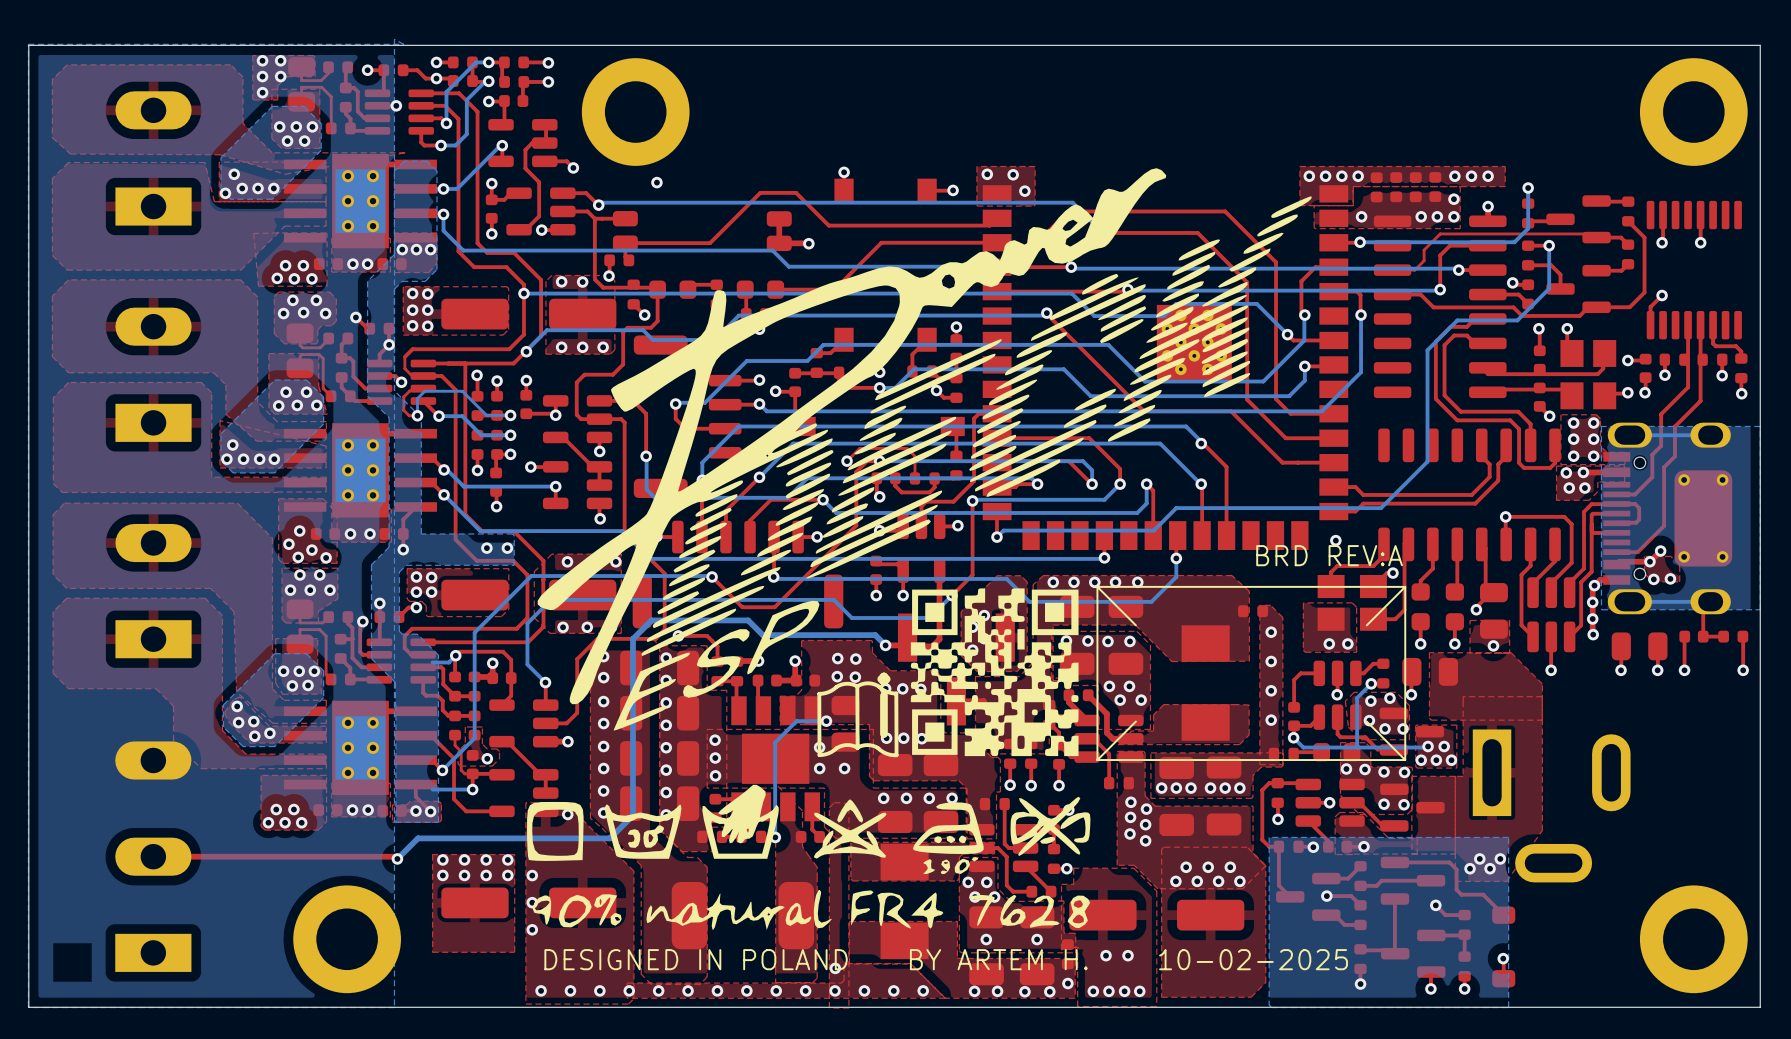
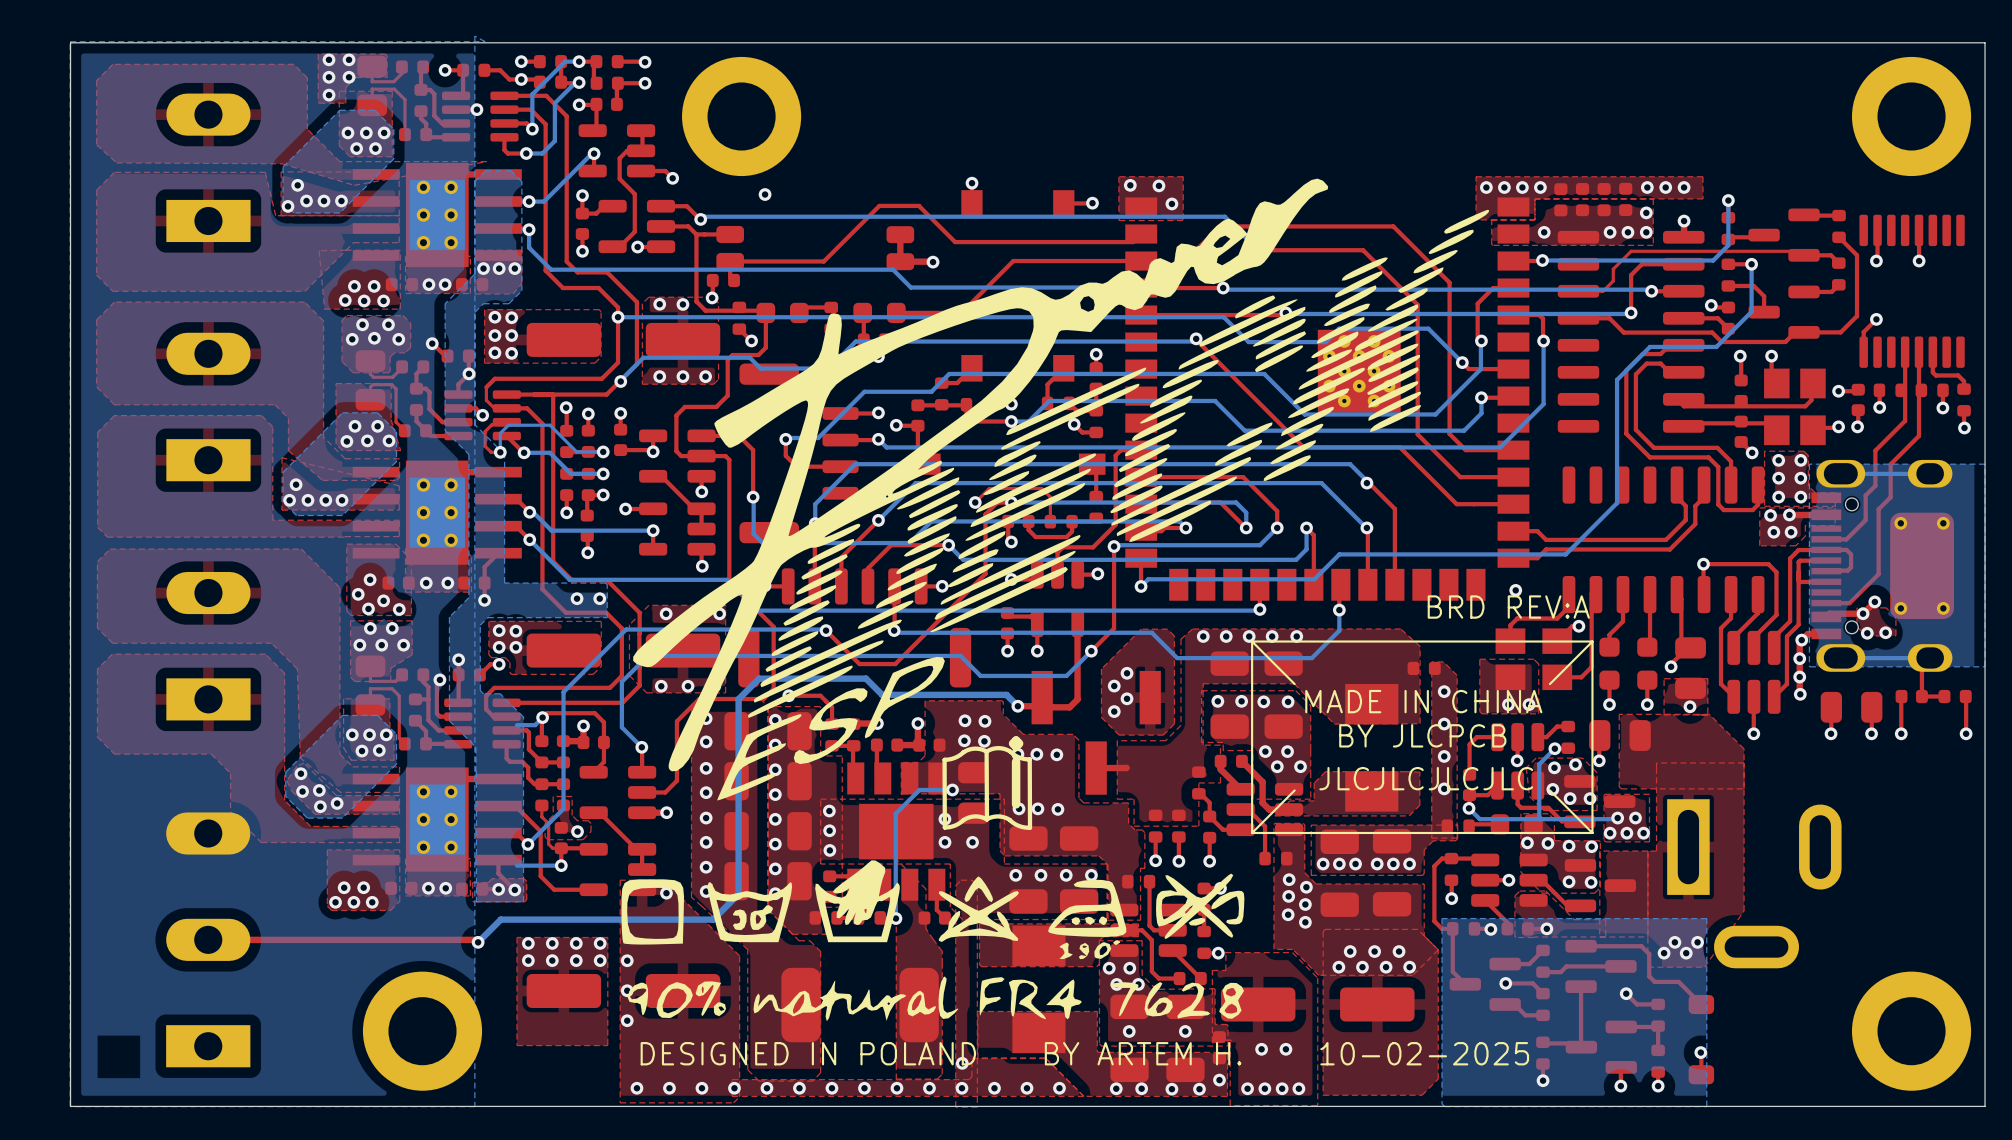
drawing: [910, 588, 1079, 757] -> none
text: none -> MADE IN CHINA (1423, 701)
text: none -> BY JLCPCB (1422, 735)
text: none -> JLCJLCJLCJLC (1426, 778)

